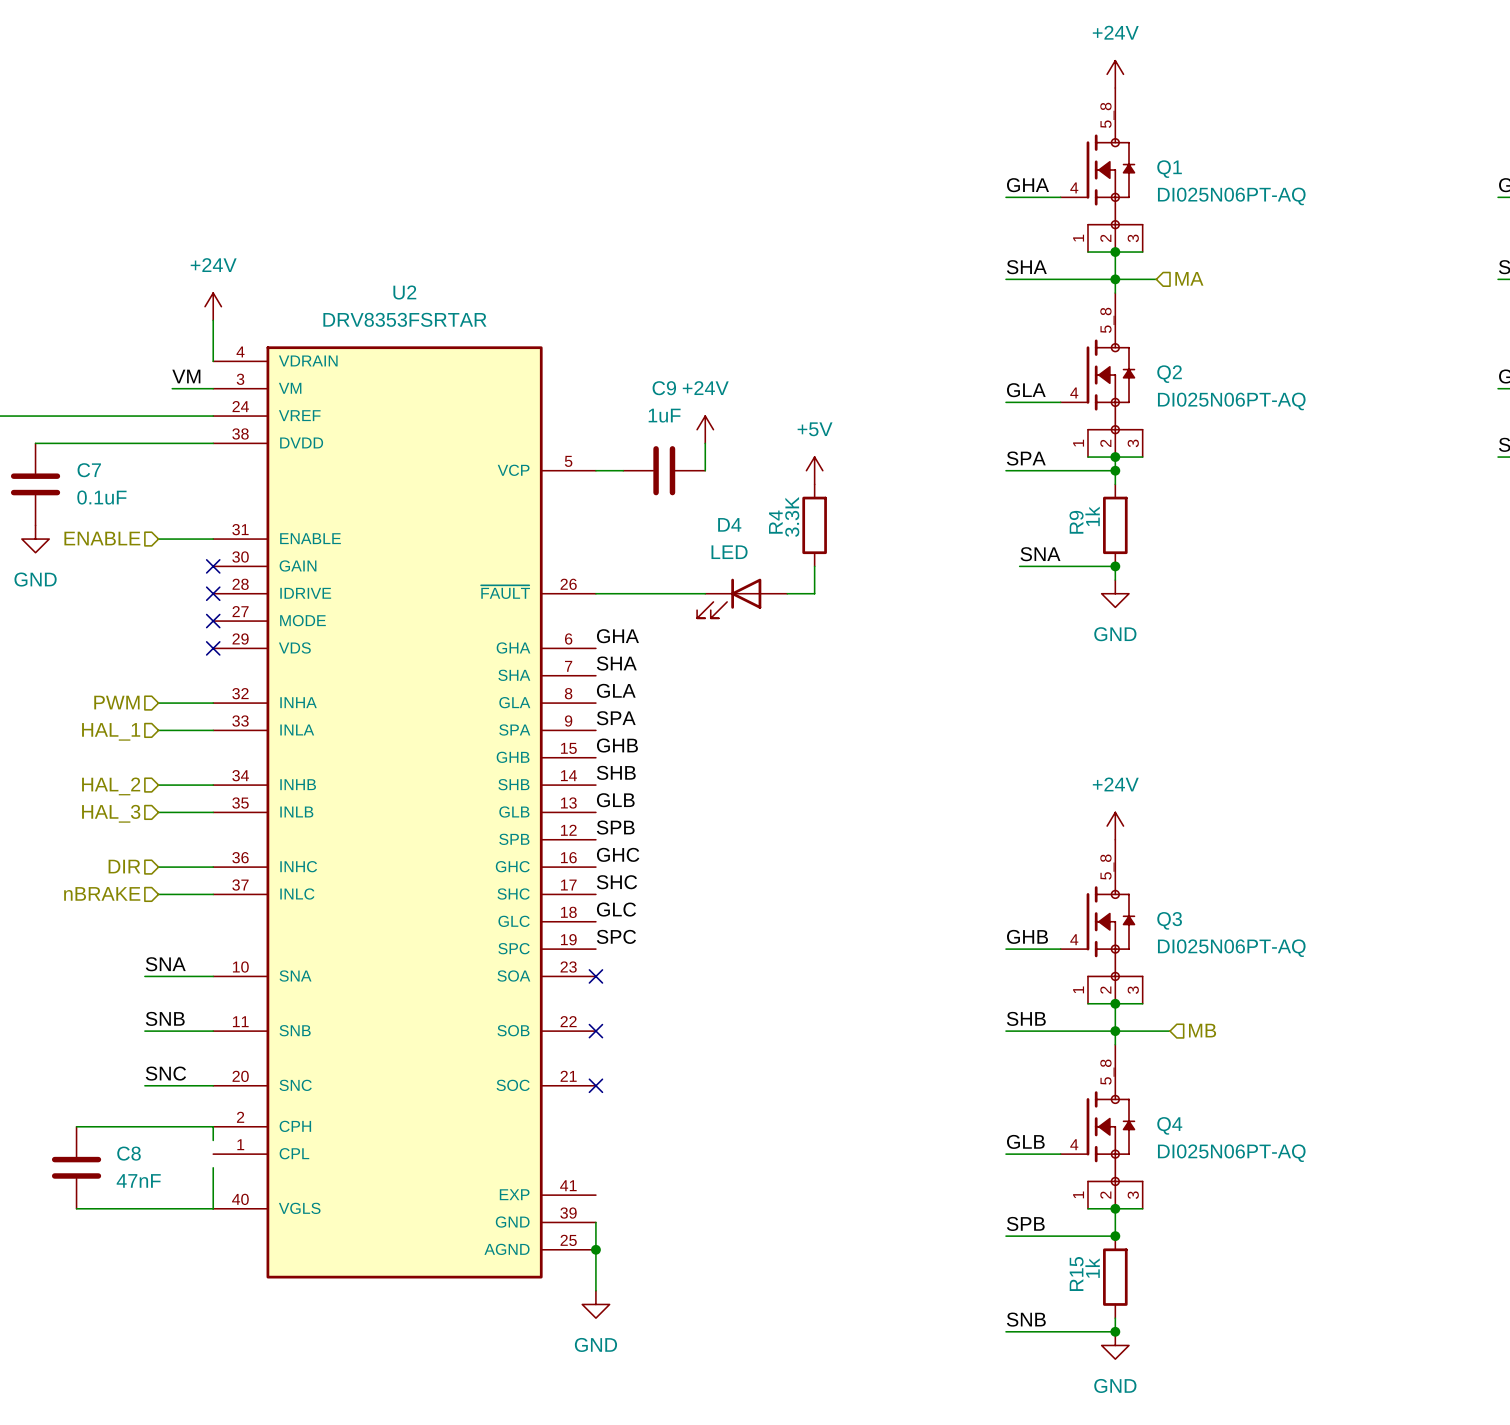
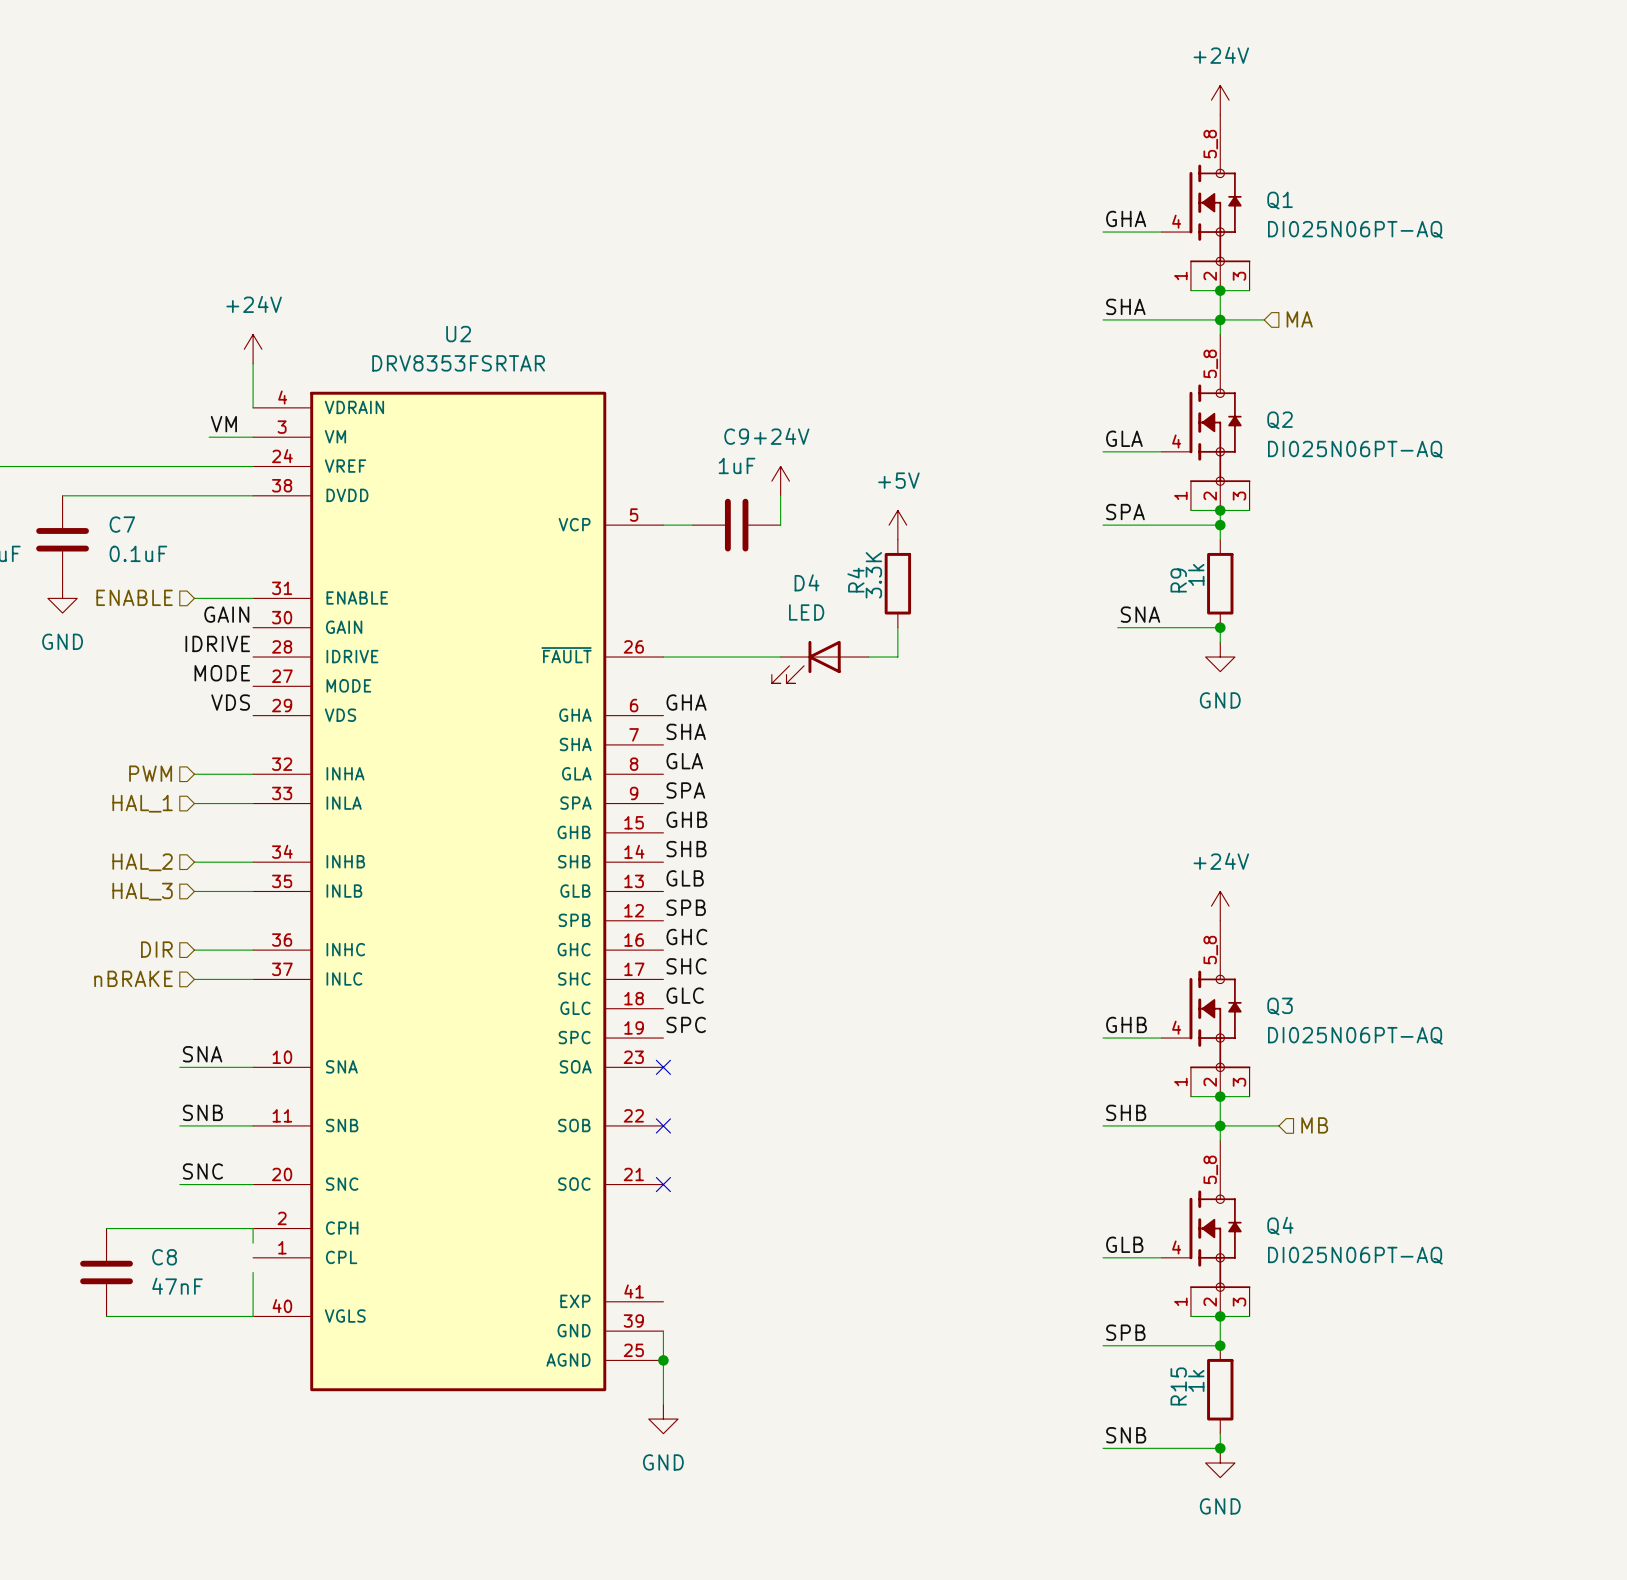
label: none -> GAIN (226, 614)
no-connect mark: (213, 566) -> none
label: none -> IDRIVE (217, 643)
no-connect mark: (213, 593) -> none
label: none -> MODE (222, 673)
no-connect mark: (213, 621) -> none
label: none -> VDS (230, 702)
no-connect mark: (213, 648) -> none

